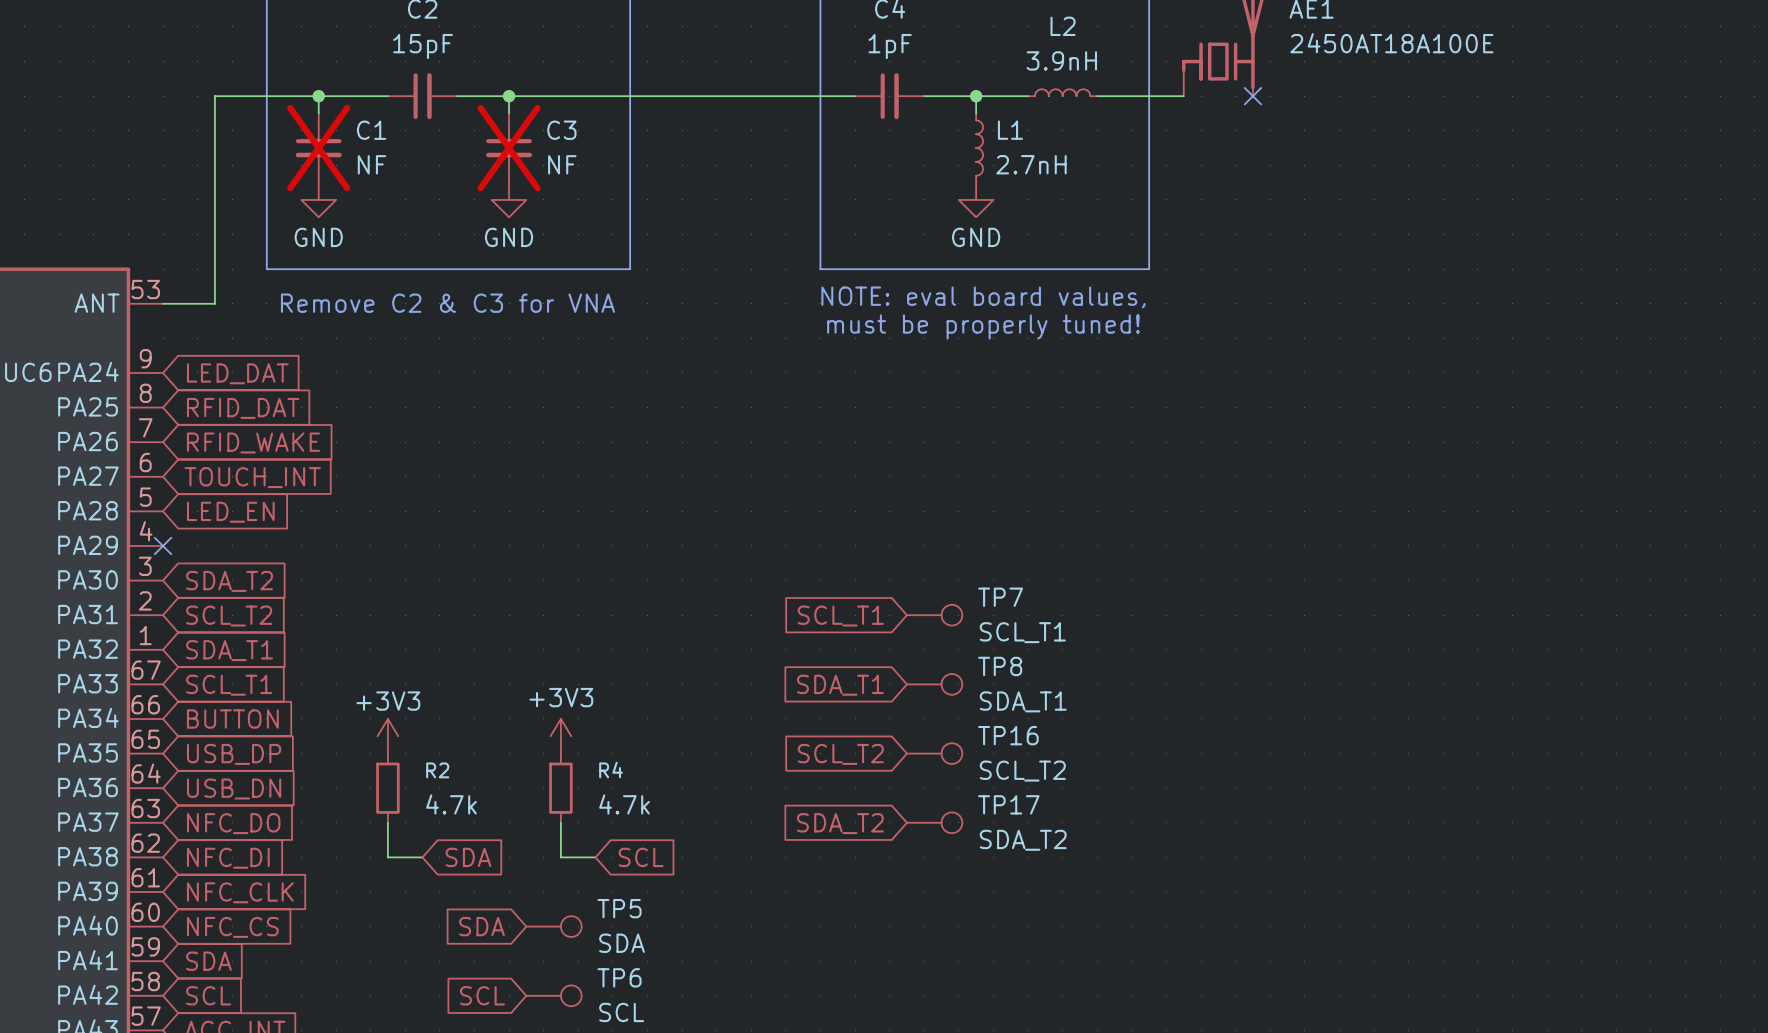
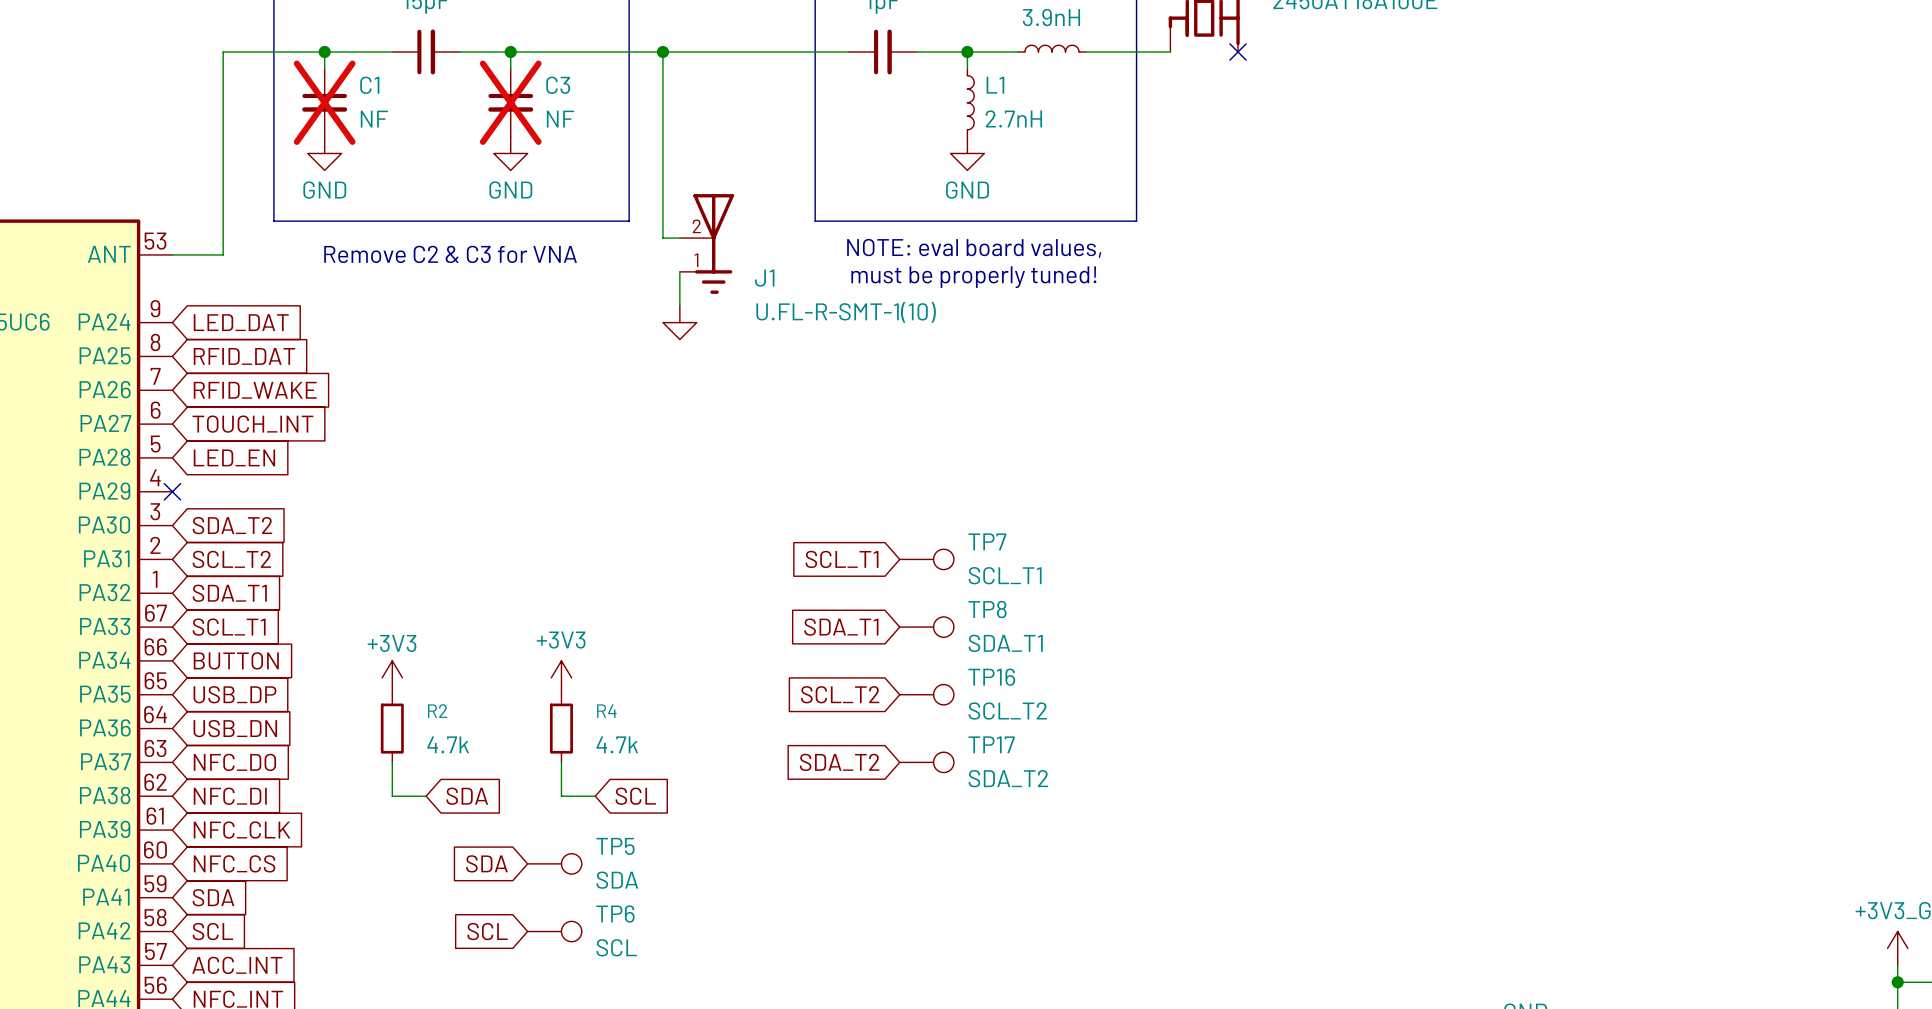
wire: none -> (662, 51) (662, 238) (679, 238)
junction: none -> (662, 51)
J1: none -> U.FL-R-SMT-1(10) (706, 243)
wire: none -> (679, 271) (679, 305)
power symbol: none -> (679, 322)

